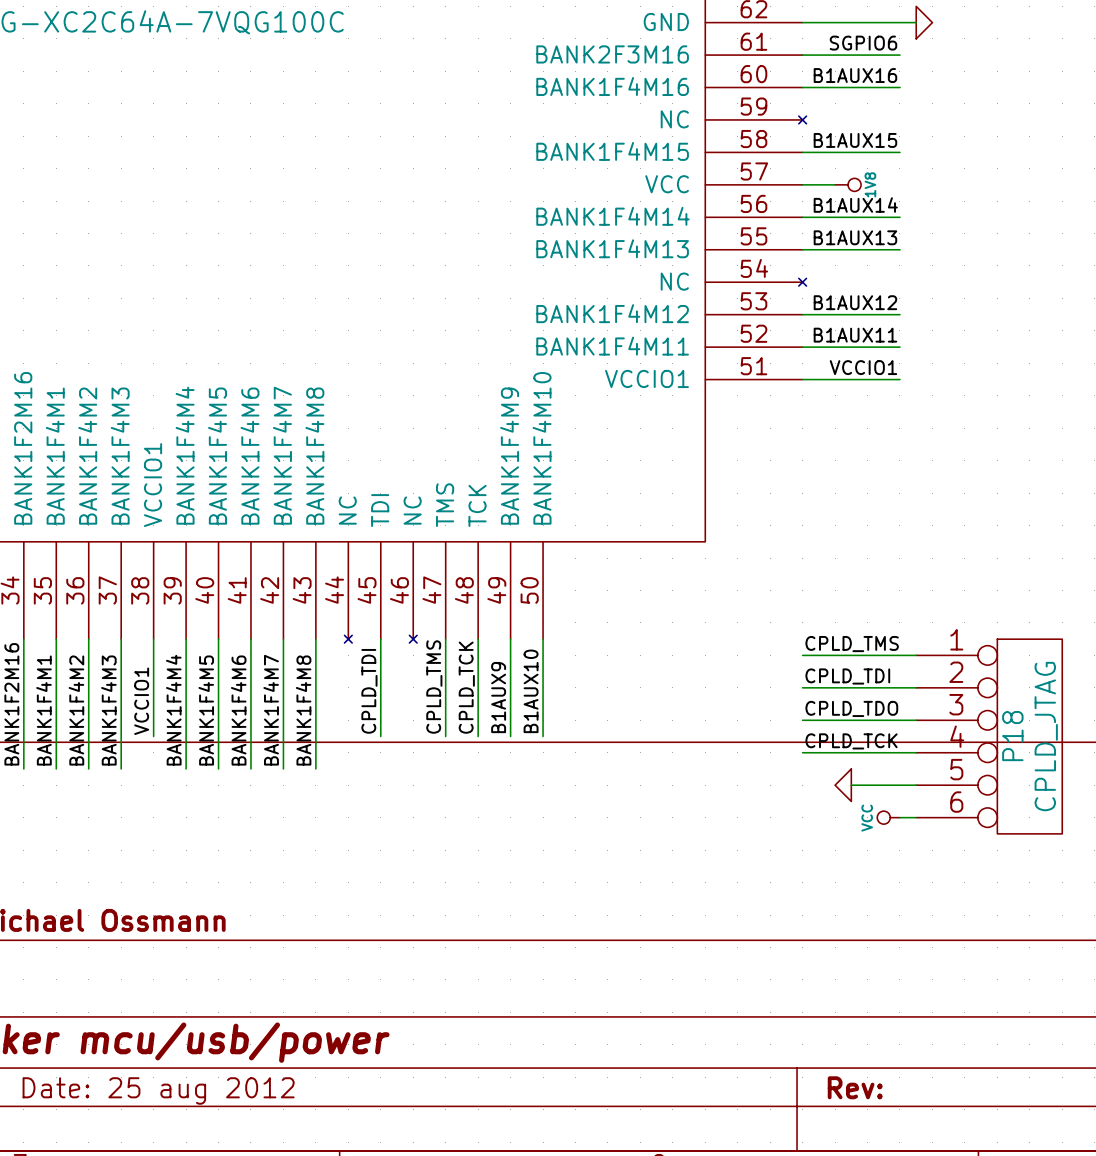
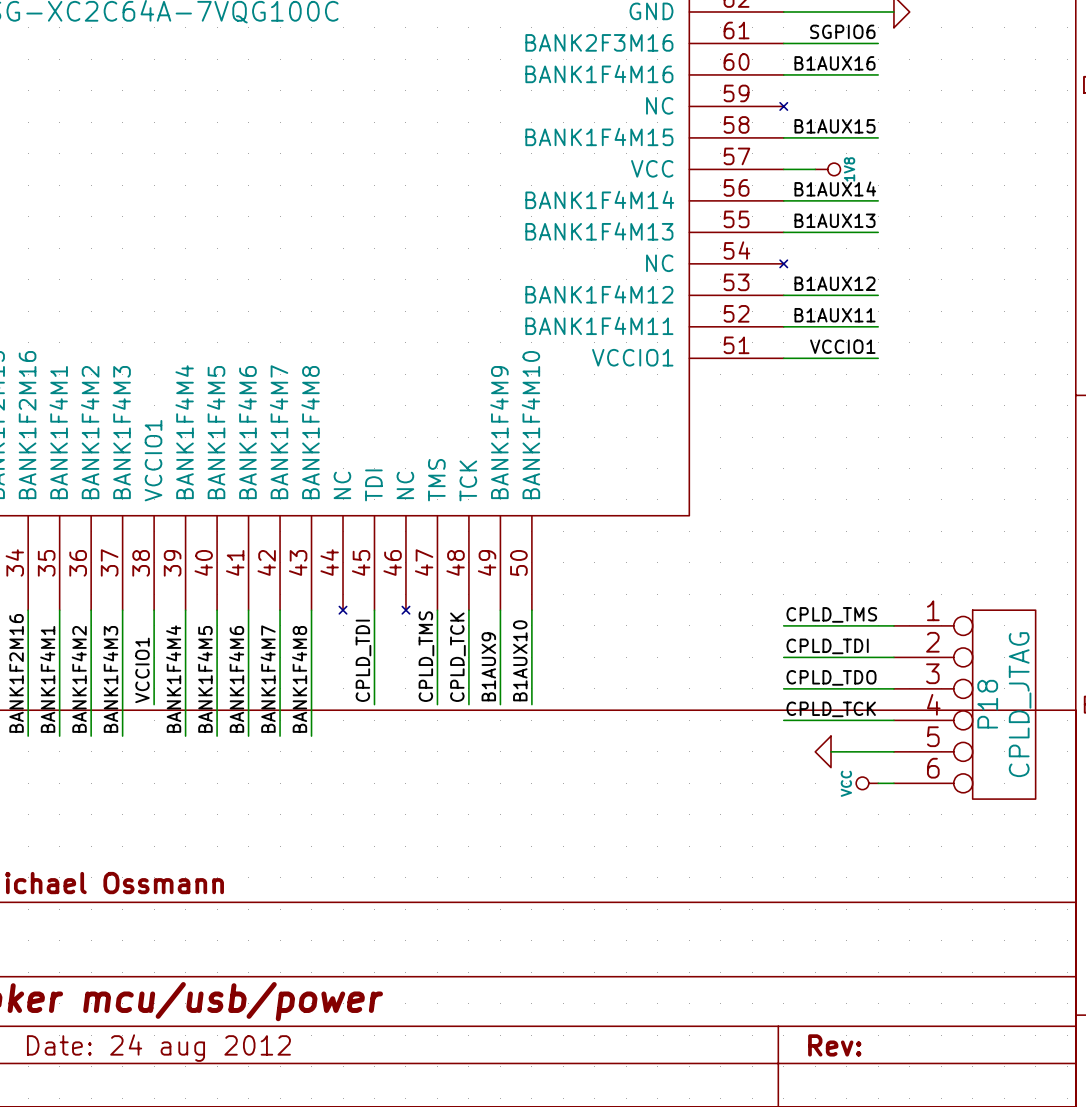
title block: Date: 25 aug 2012 (158, 1090) -> Date: 24 aug 2012 (158, 1048)

